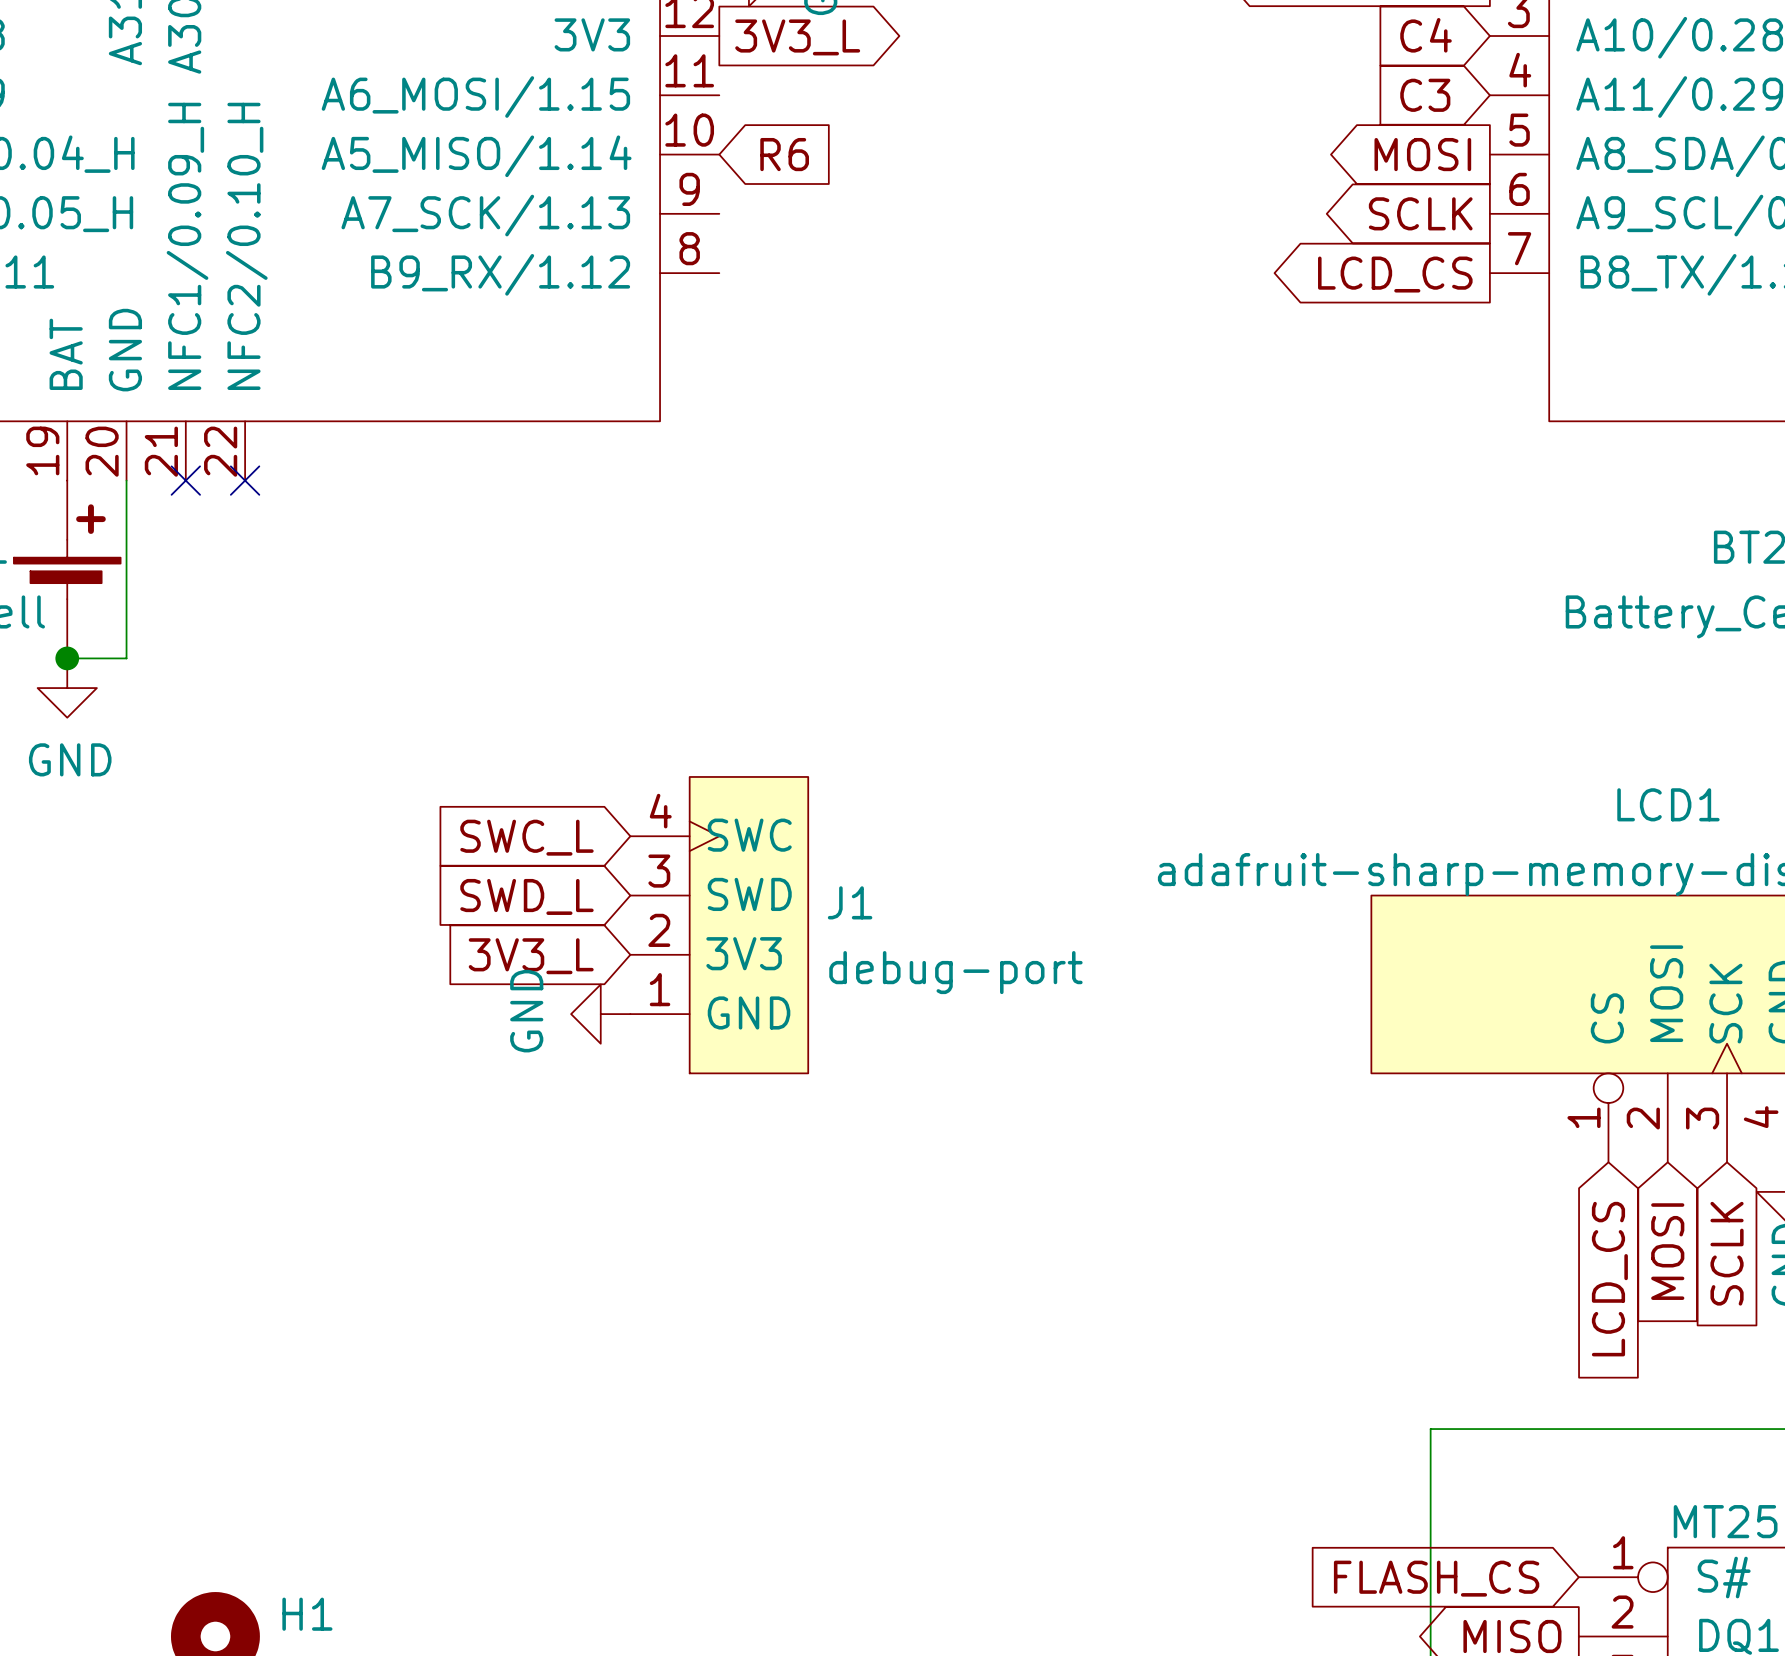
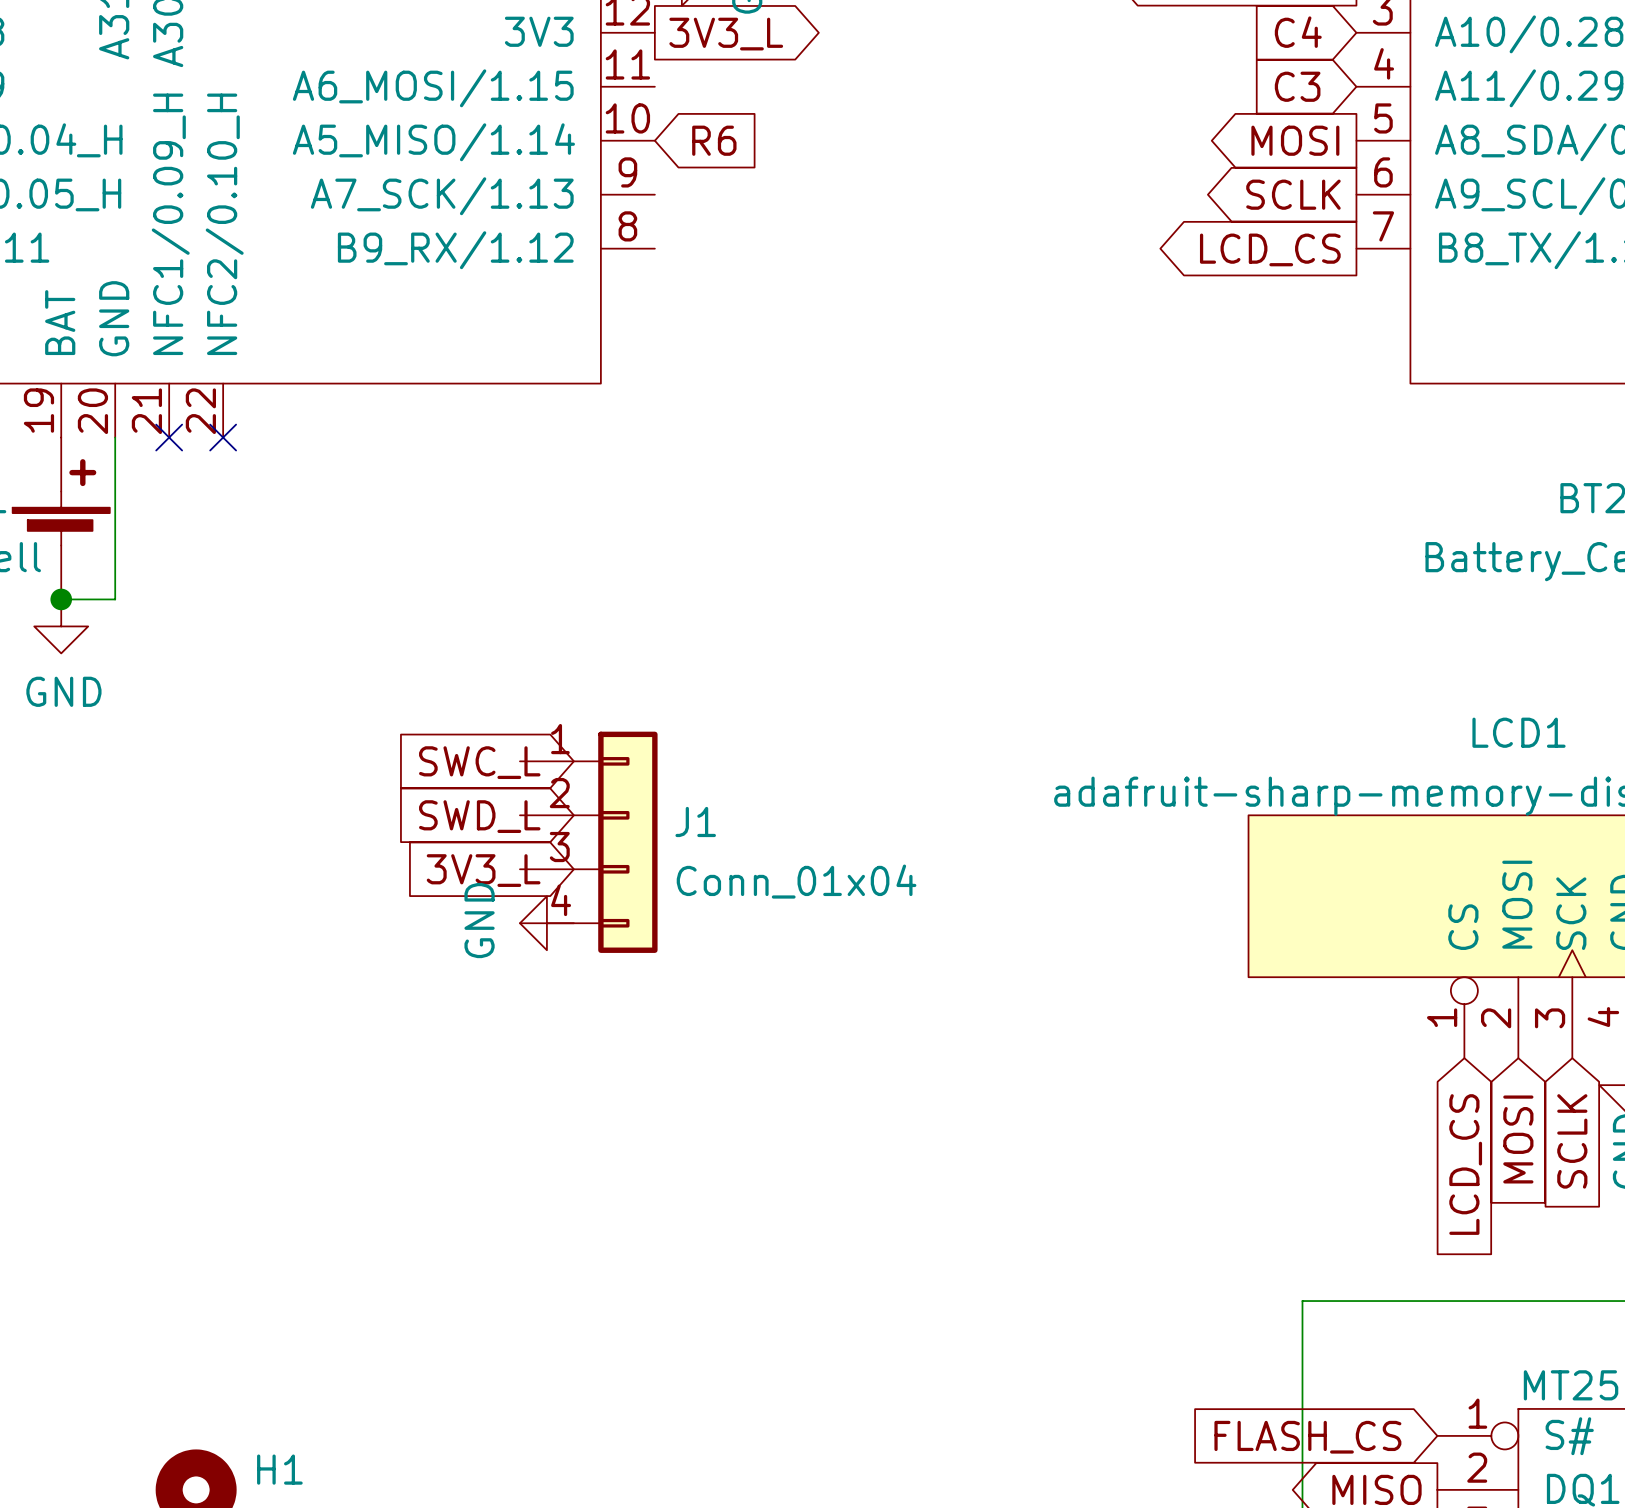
J1 symbol: [630, 776, 809, 1074] -> [519, 731, 658, 953]
J1 value: debug-port (955, 972) -> Conn_01x04 (796, 881)

